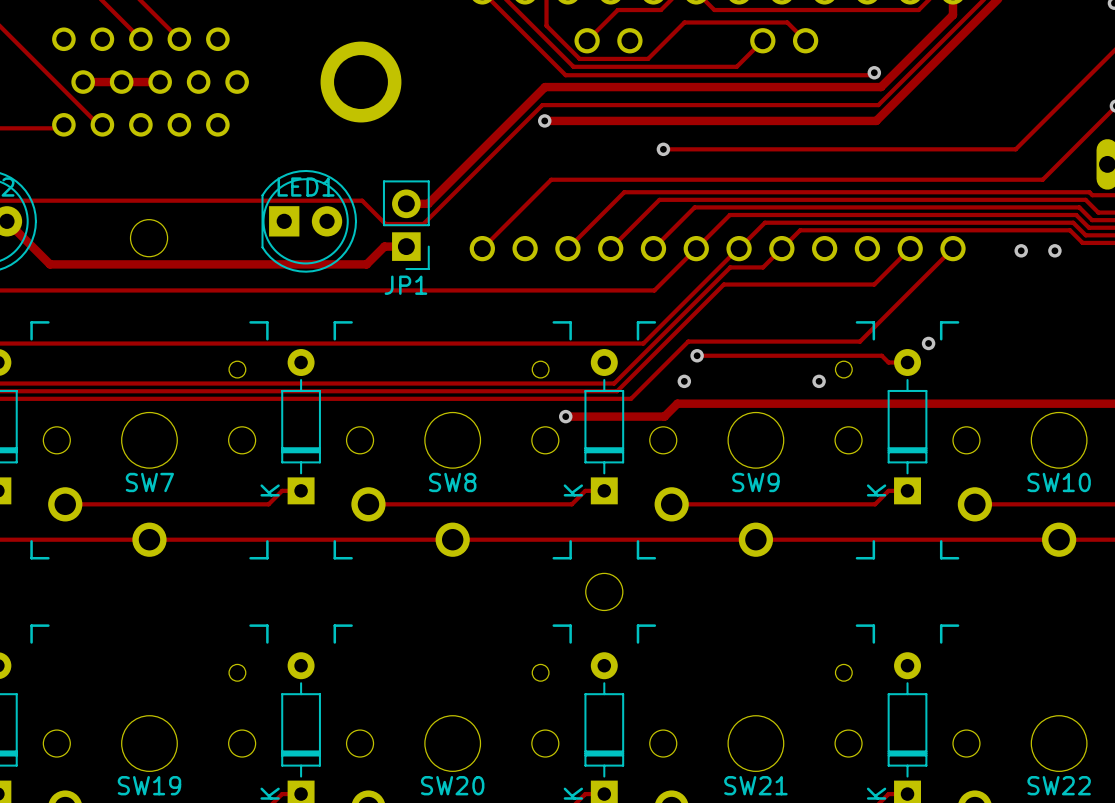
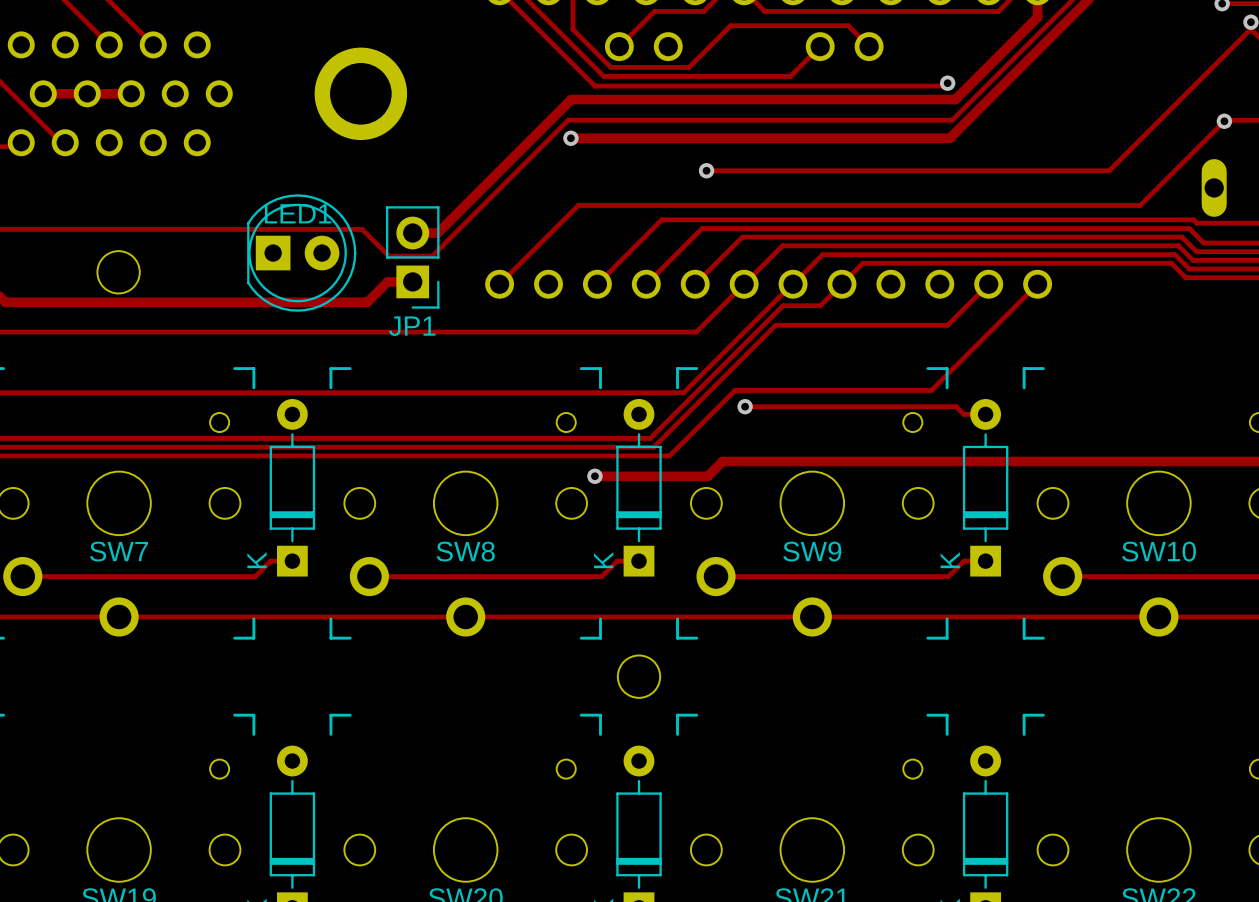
via: (1021, 250) -> none
via: (1054, 250) -> none
via: (928, 343) -> none
via: (684, 381) -> none
via: (819, 381) -> none

